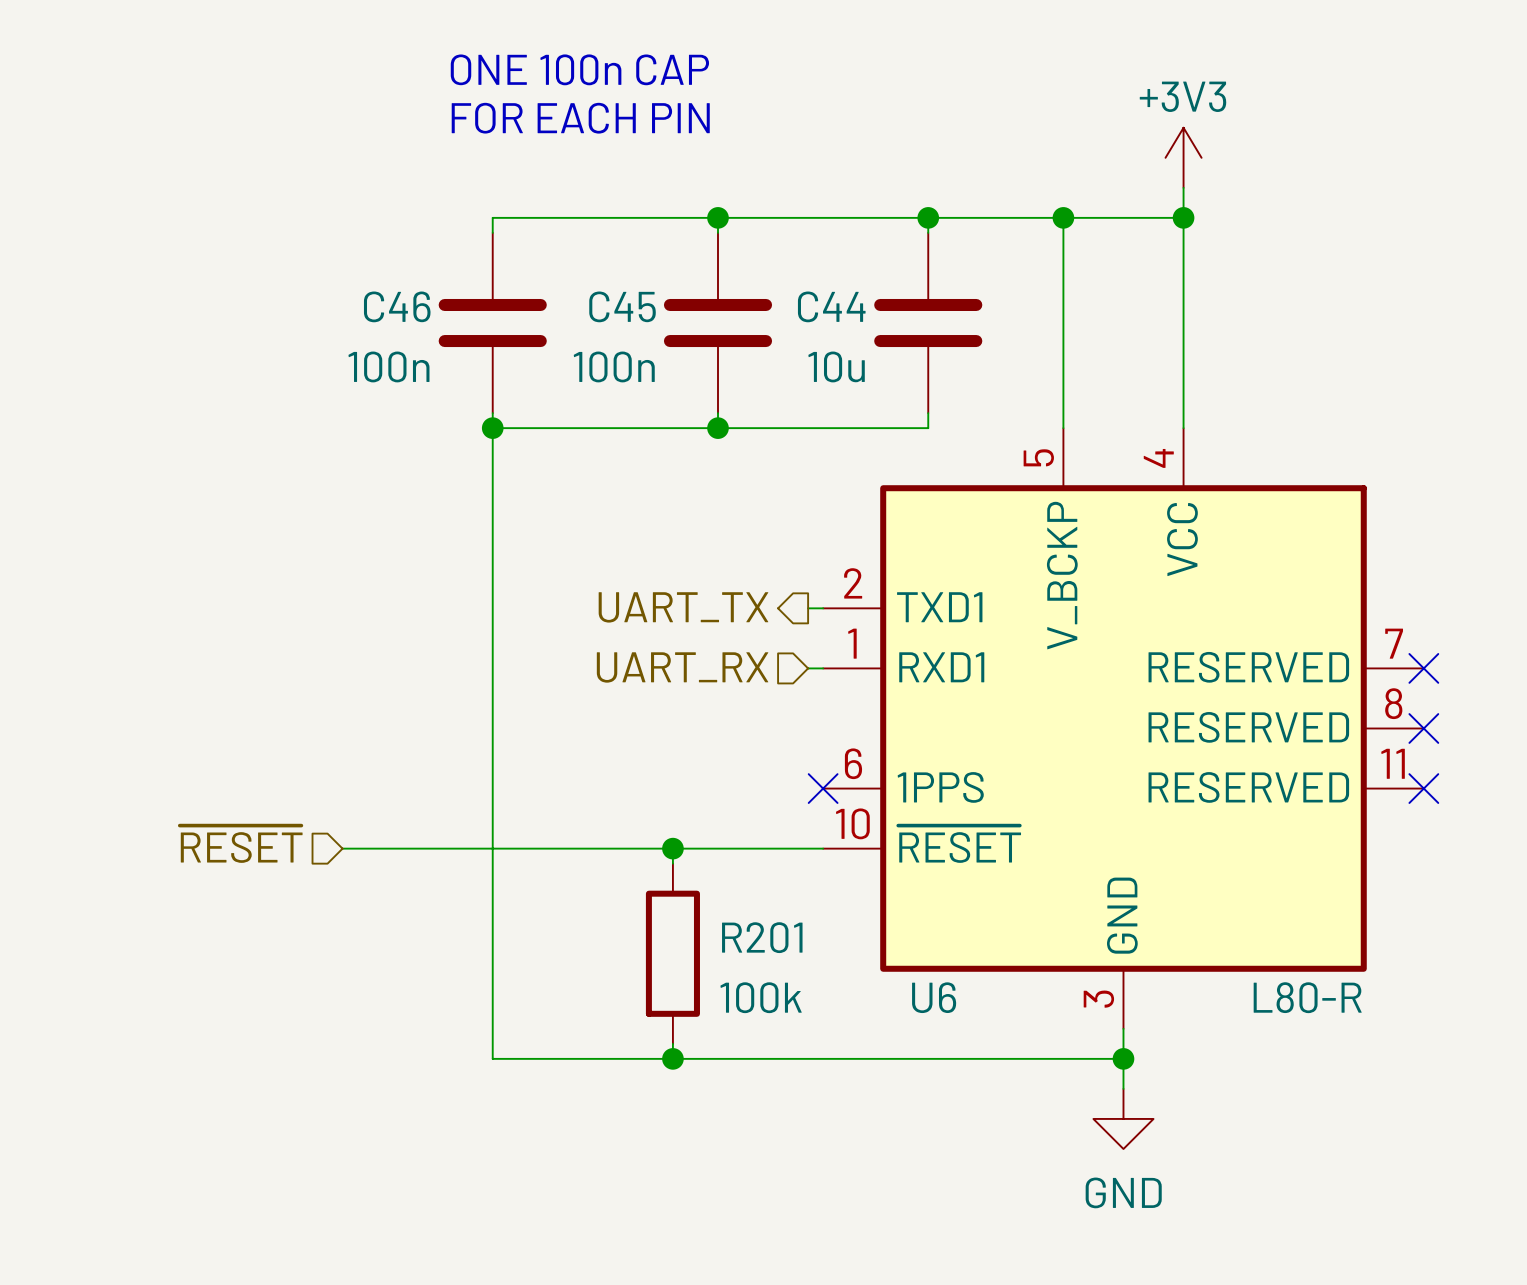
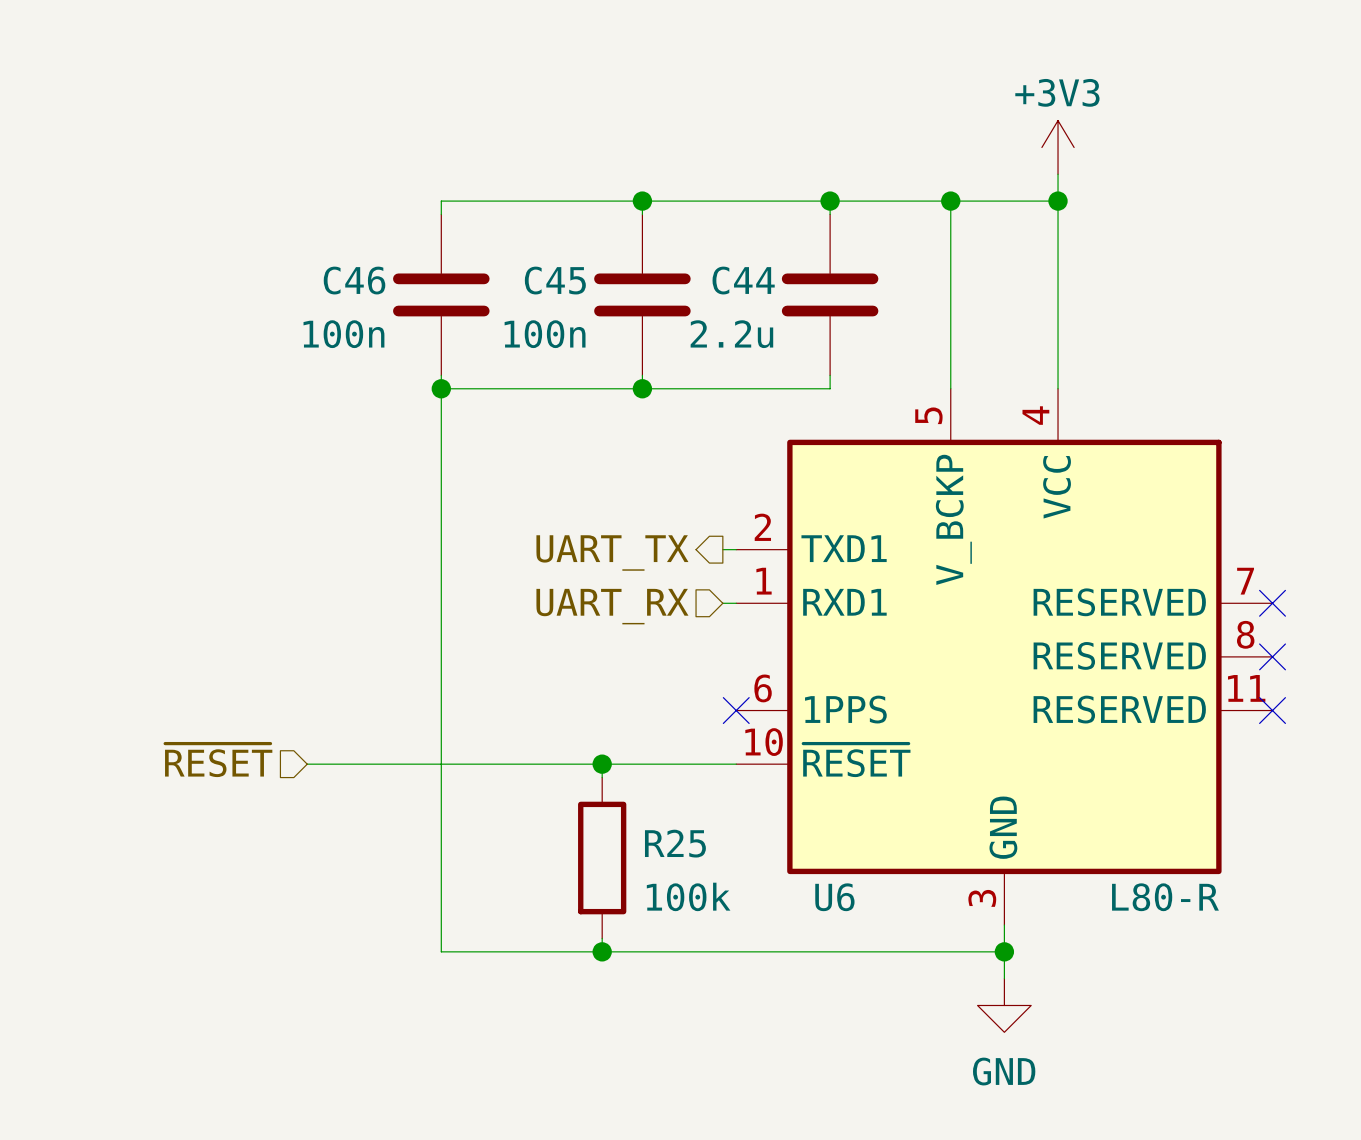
text: ONE 100n CAP (579, 69) -> none
text: FOR EACH PIN (580, 118) -> none
C44 value: 10u (836, 366) -> 2.2u (731, 334)
R201 name: R201 (762, 937) -> R25 (675, 843)

